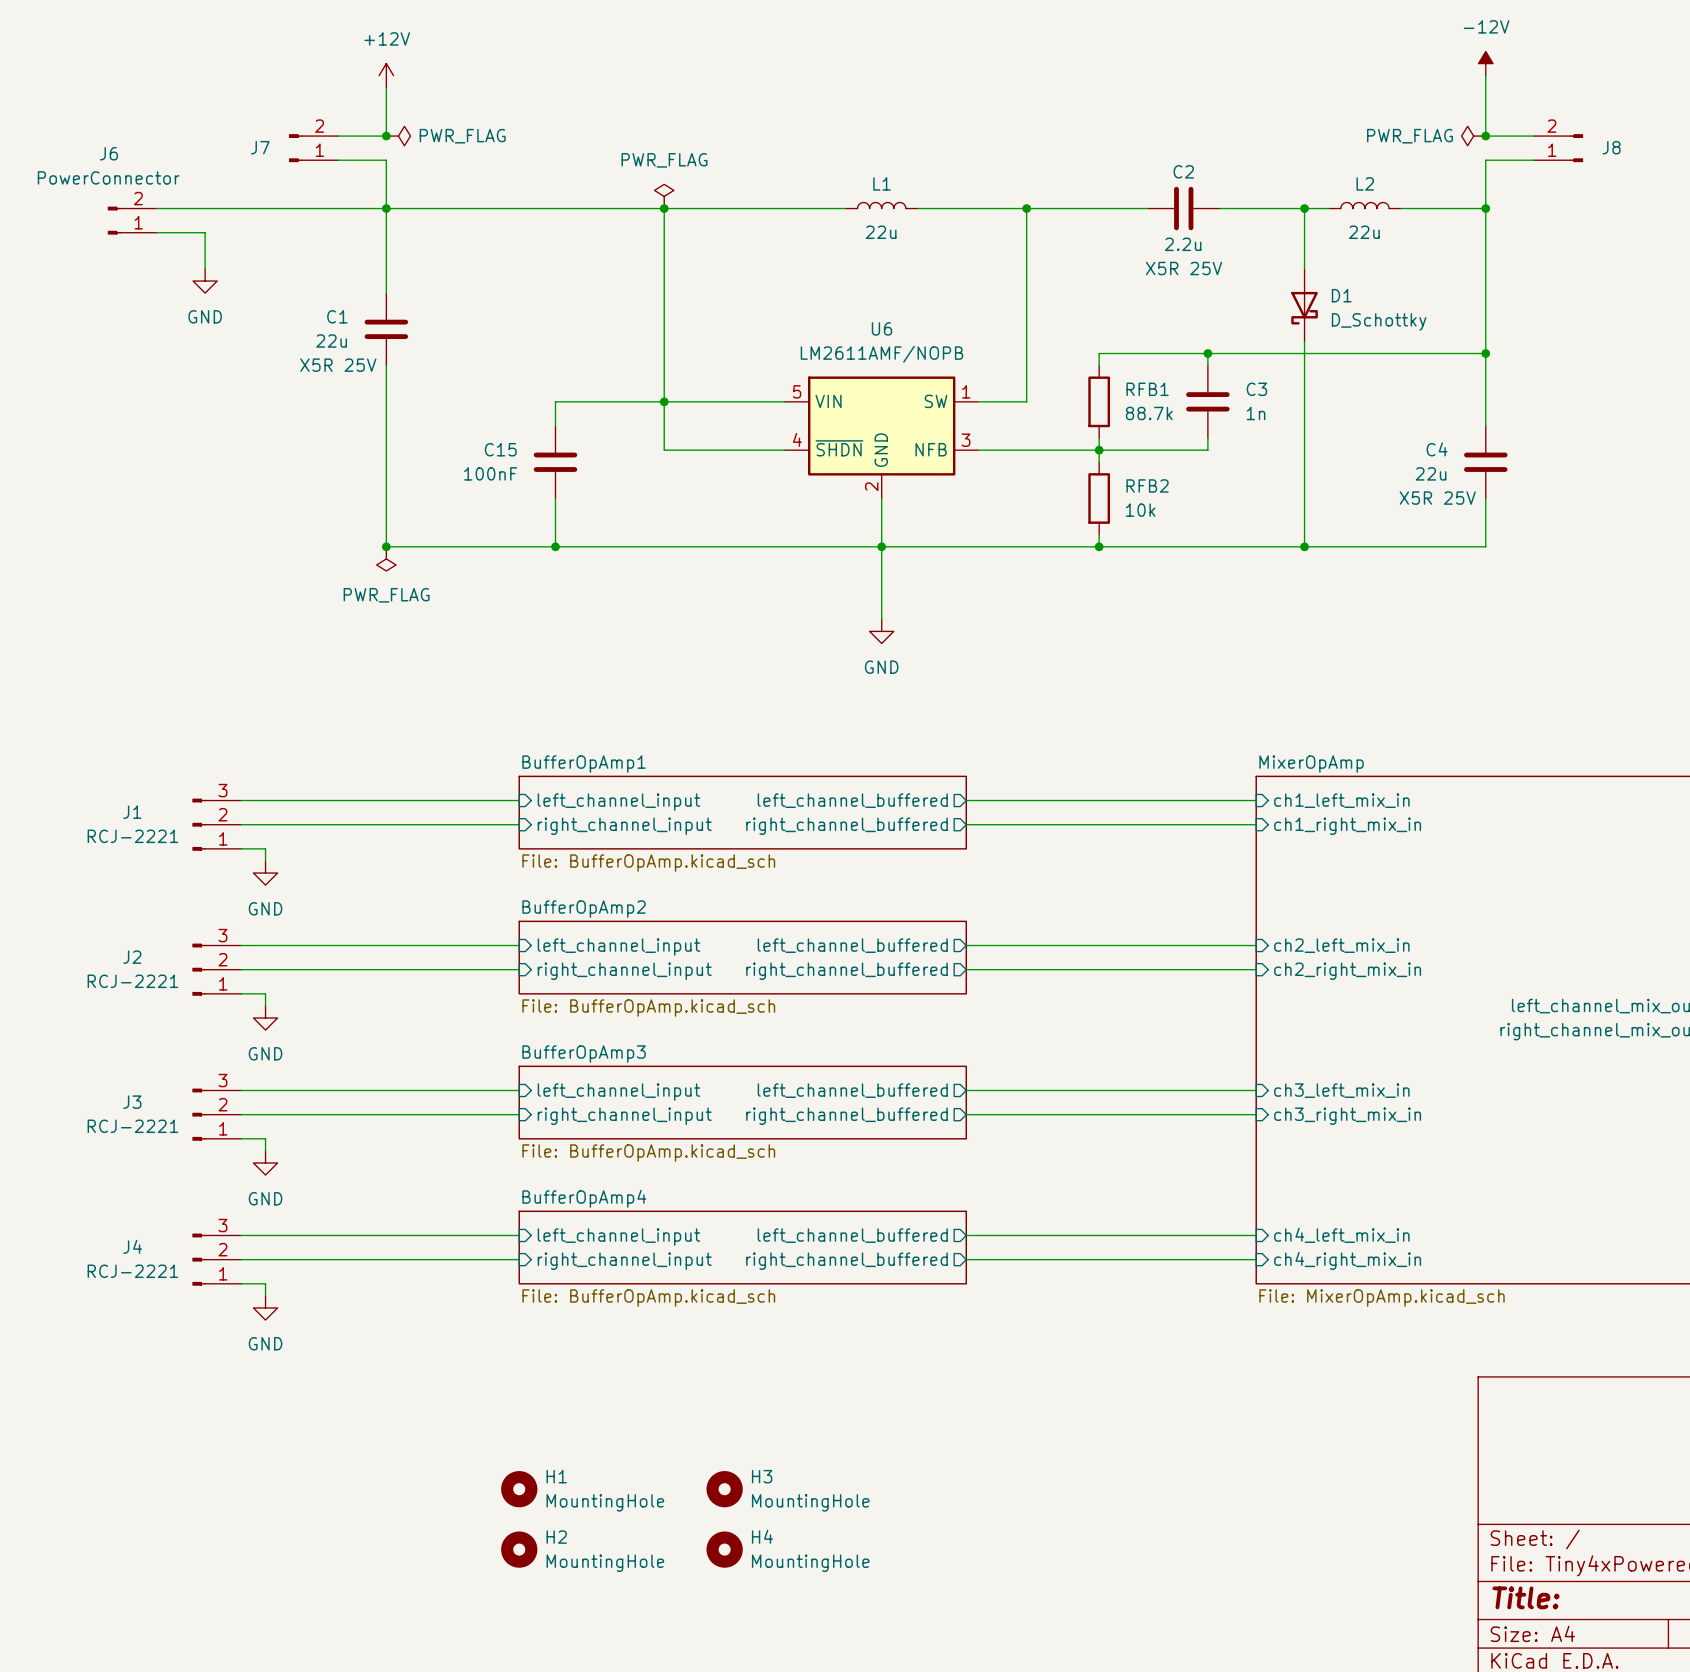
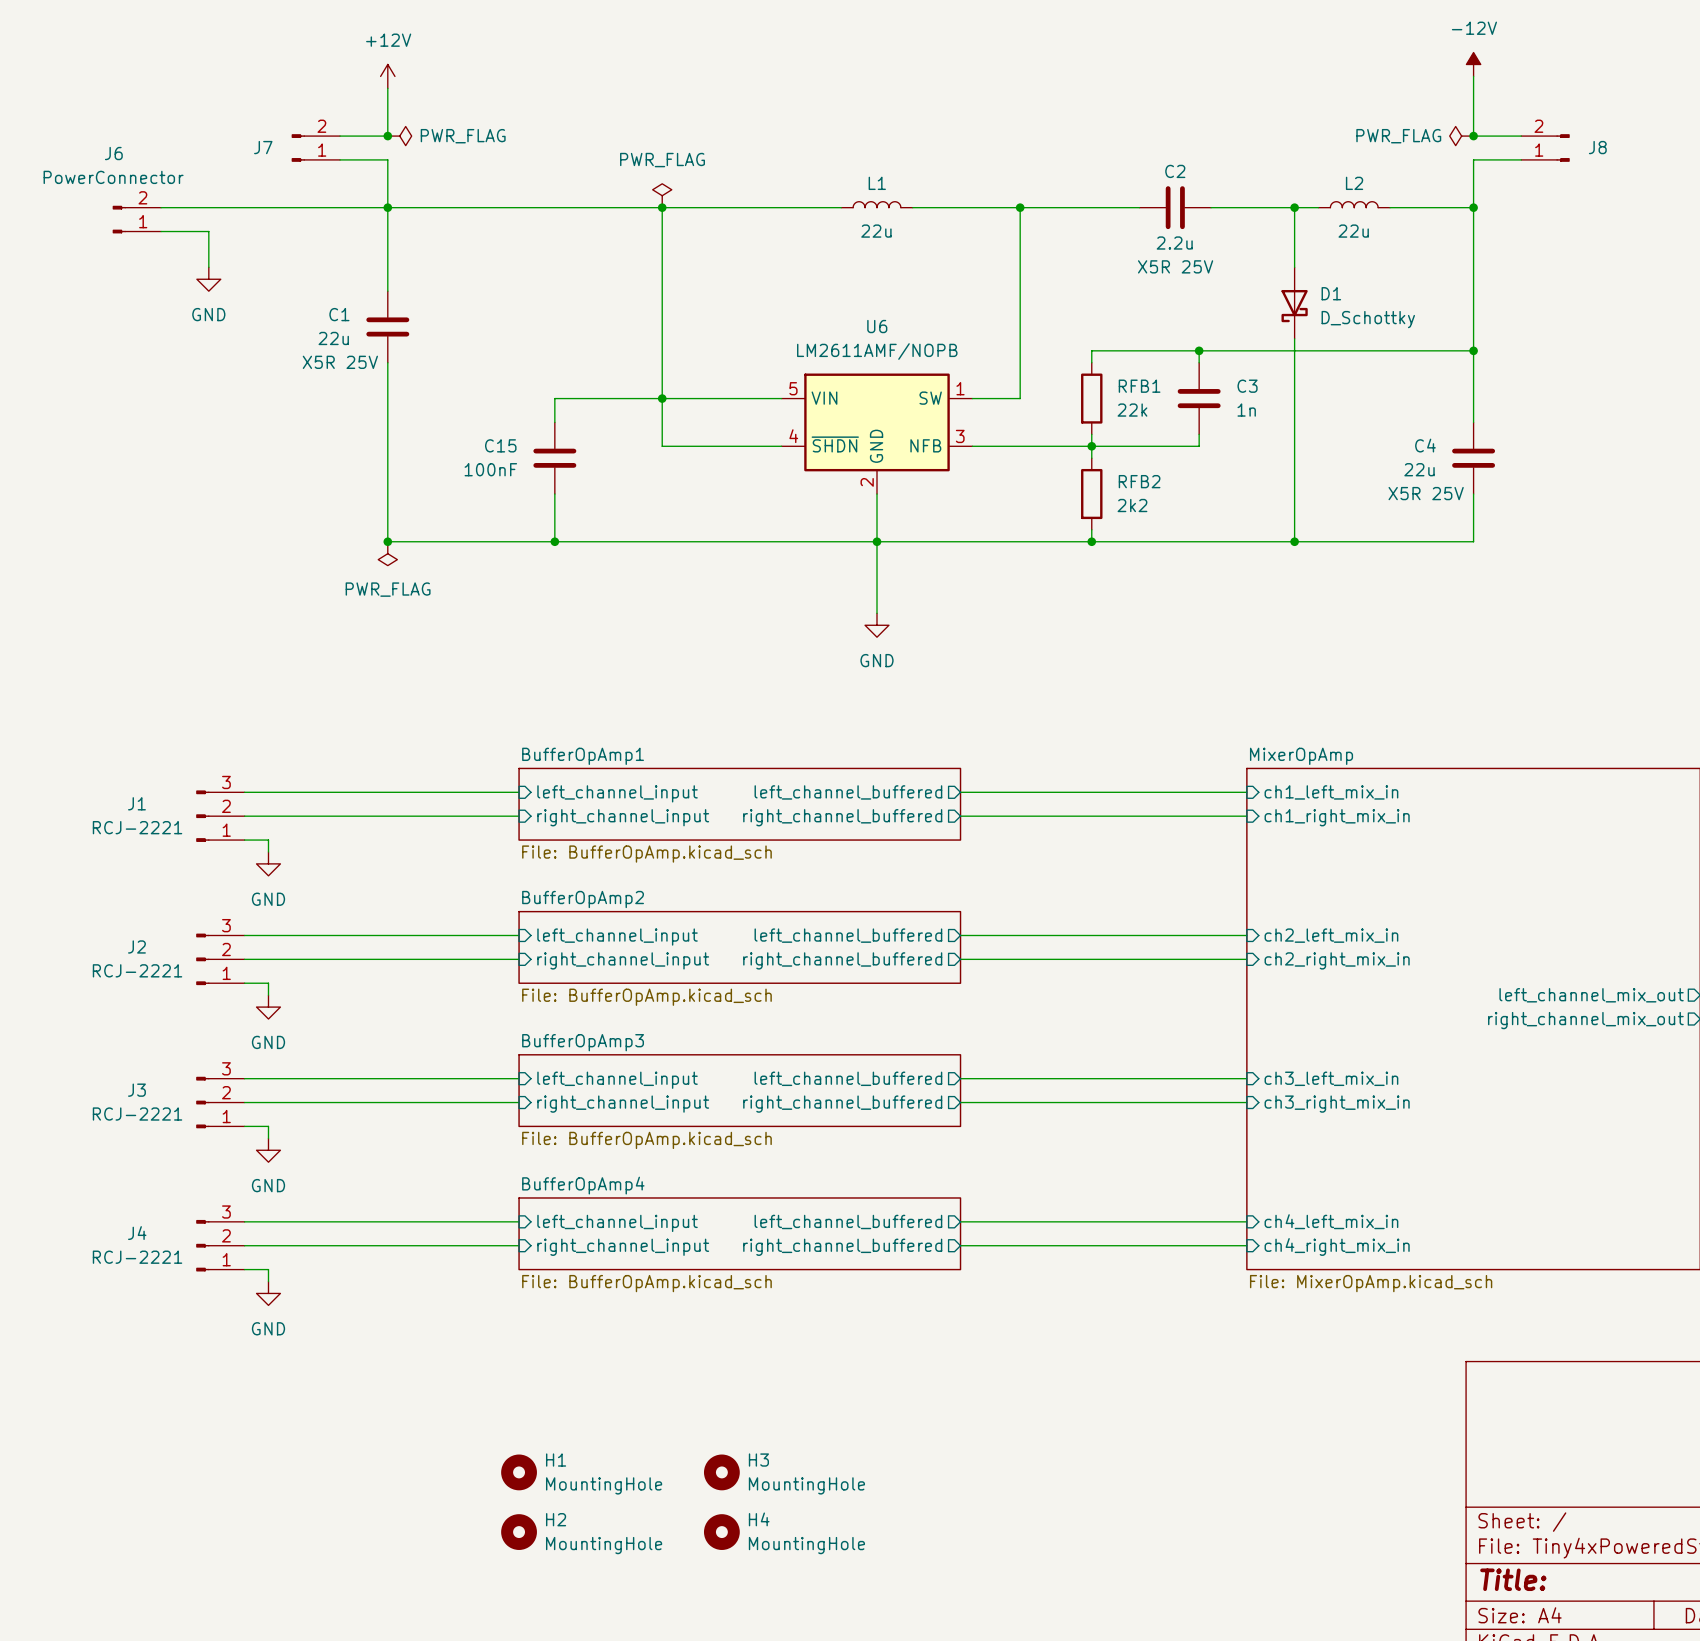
RFB1 value: 88.7k (1149, 413) -> 22k (1132, 410)
RFB2 value: 10k (1140, 510) -> 2k2 (1132, 505)

